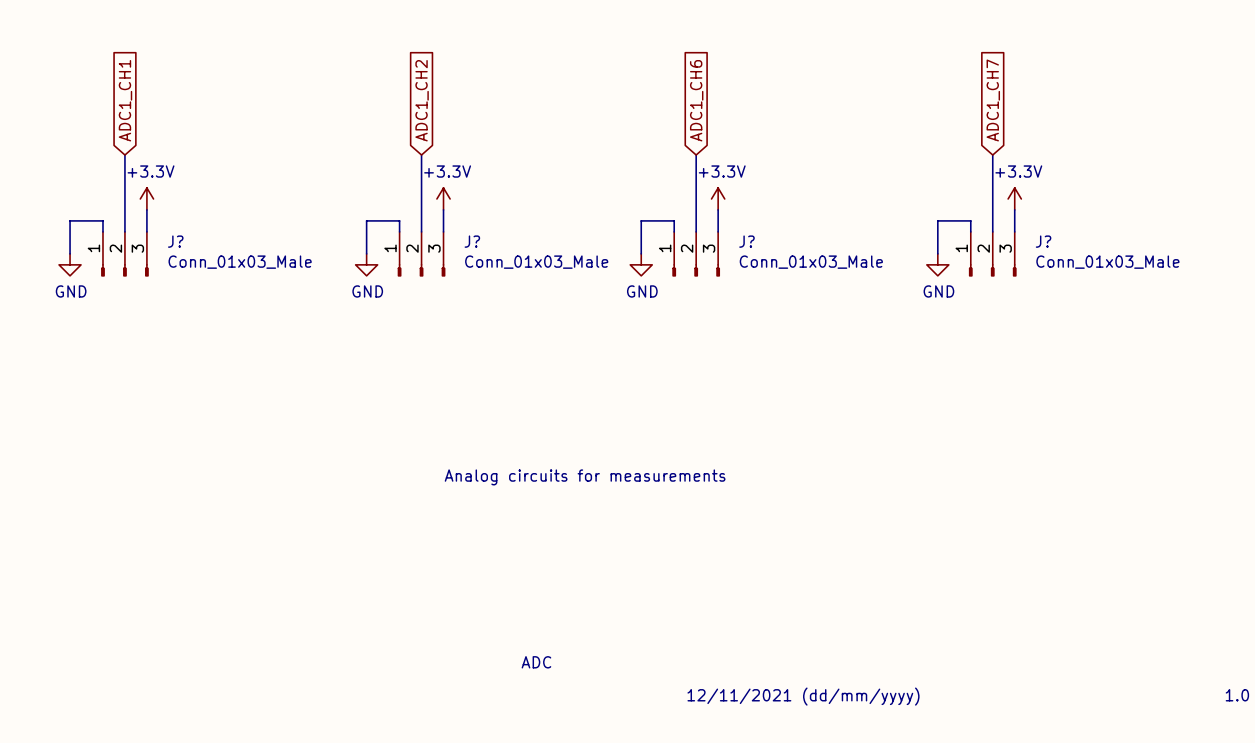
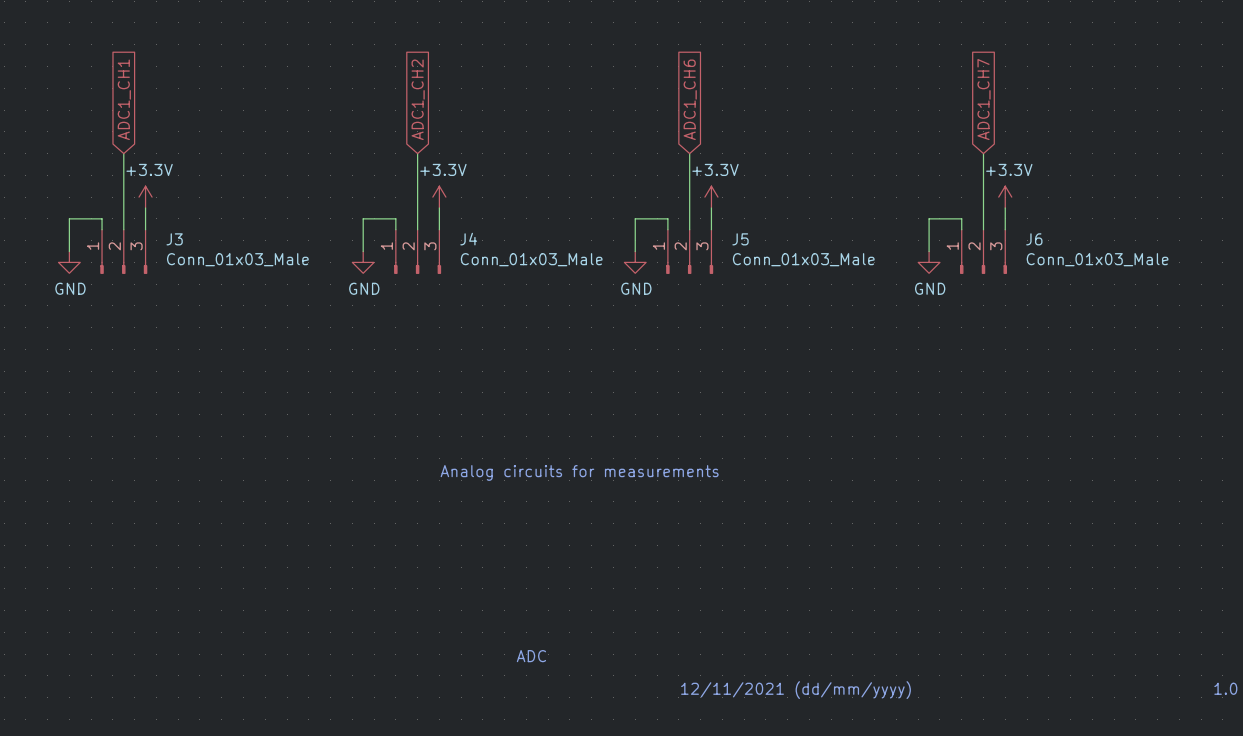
J? name: J? (175, 241) -> J3 (174, 239)
J? name: J? (472, 241) -> J4 (468, 239)
J? name: J? (746, 241) -> J5 (740, 239)
J? name: J? (1043, 241) -> J6 (1034, 239)

